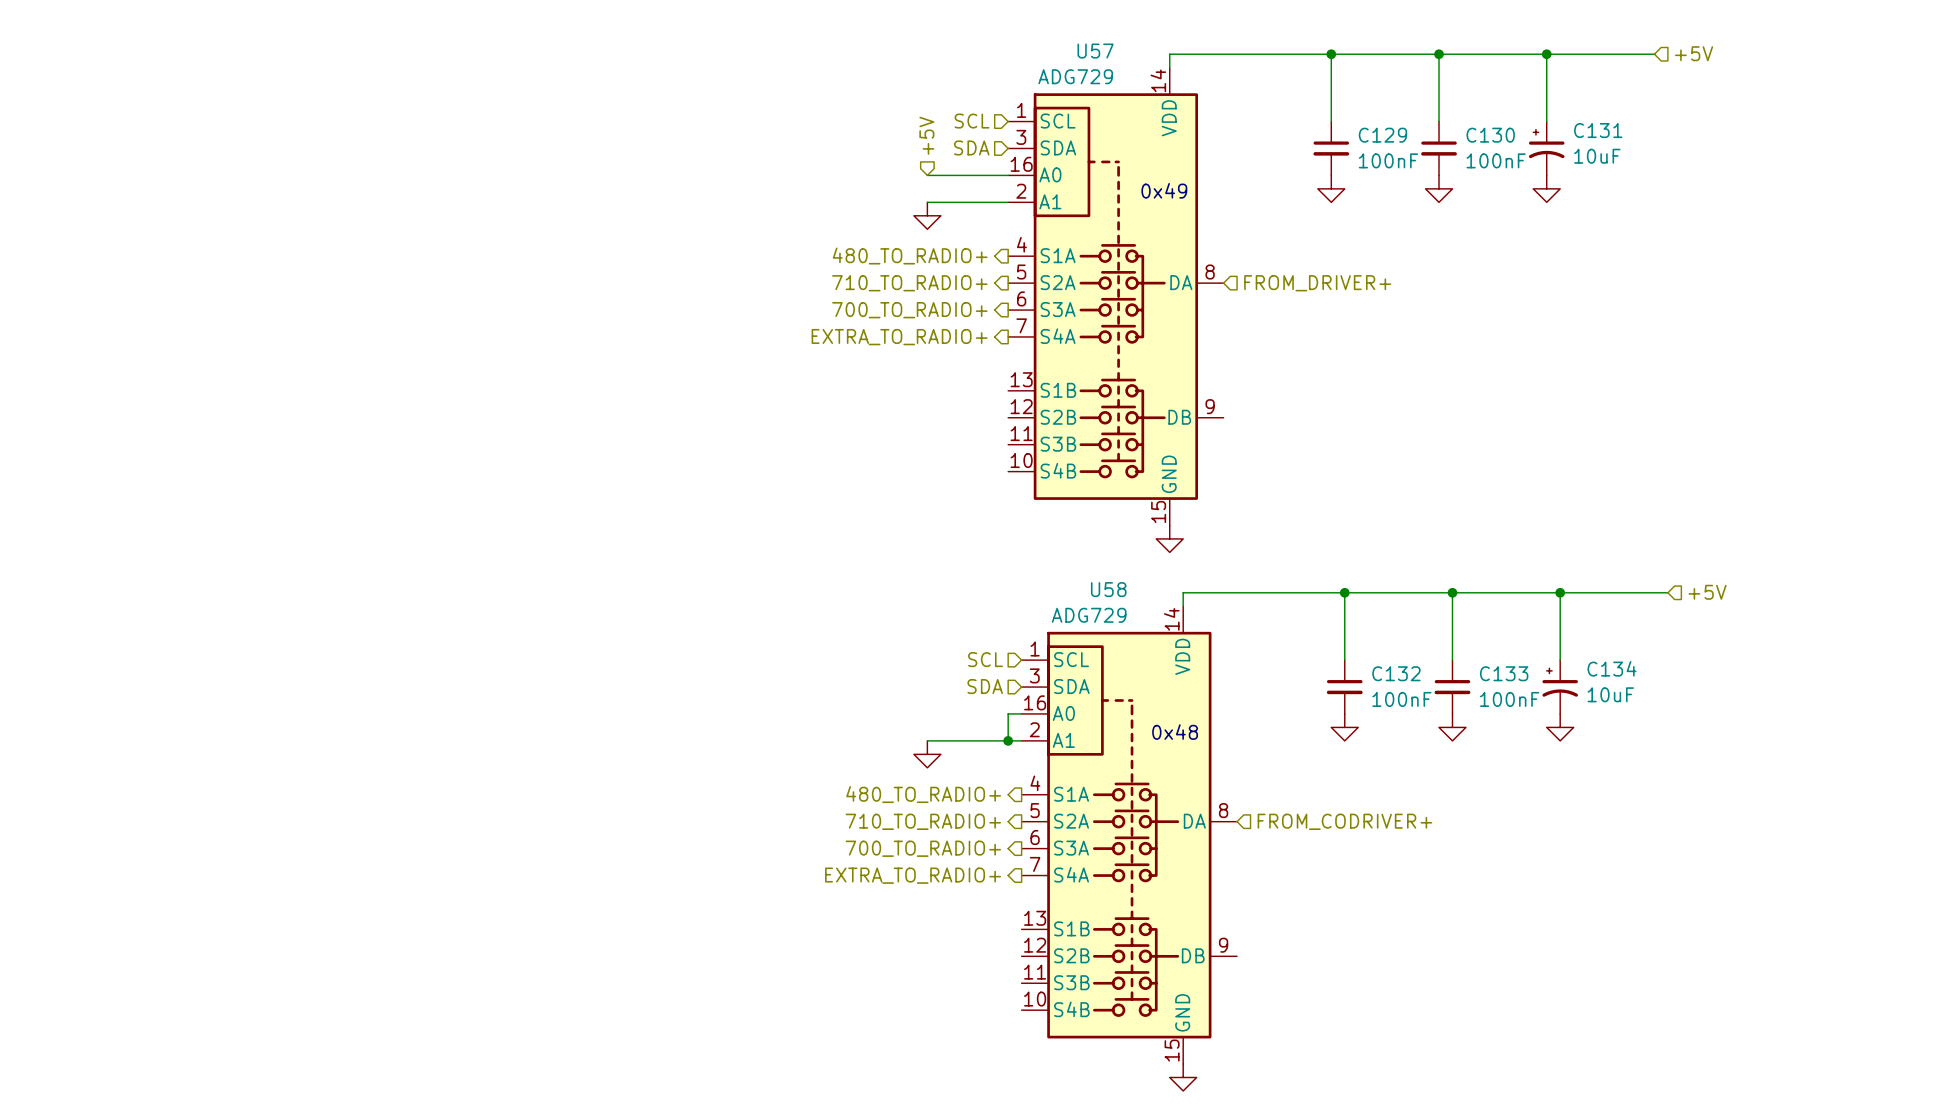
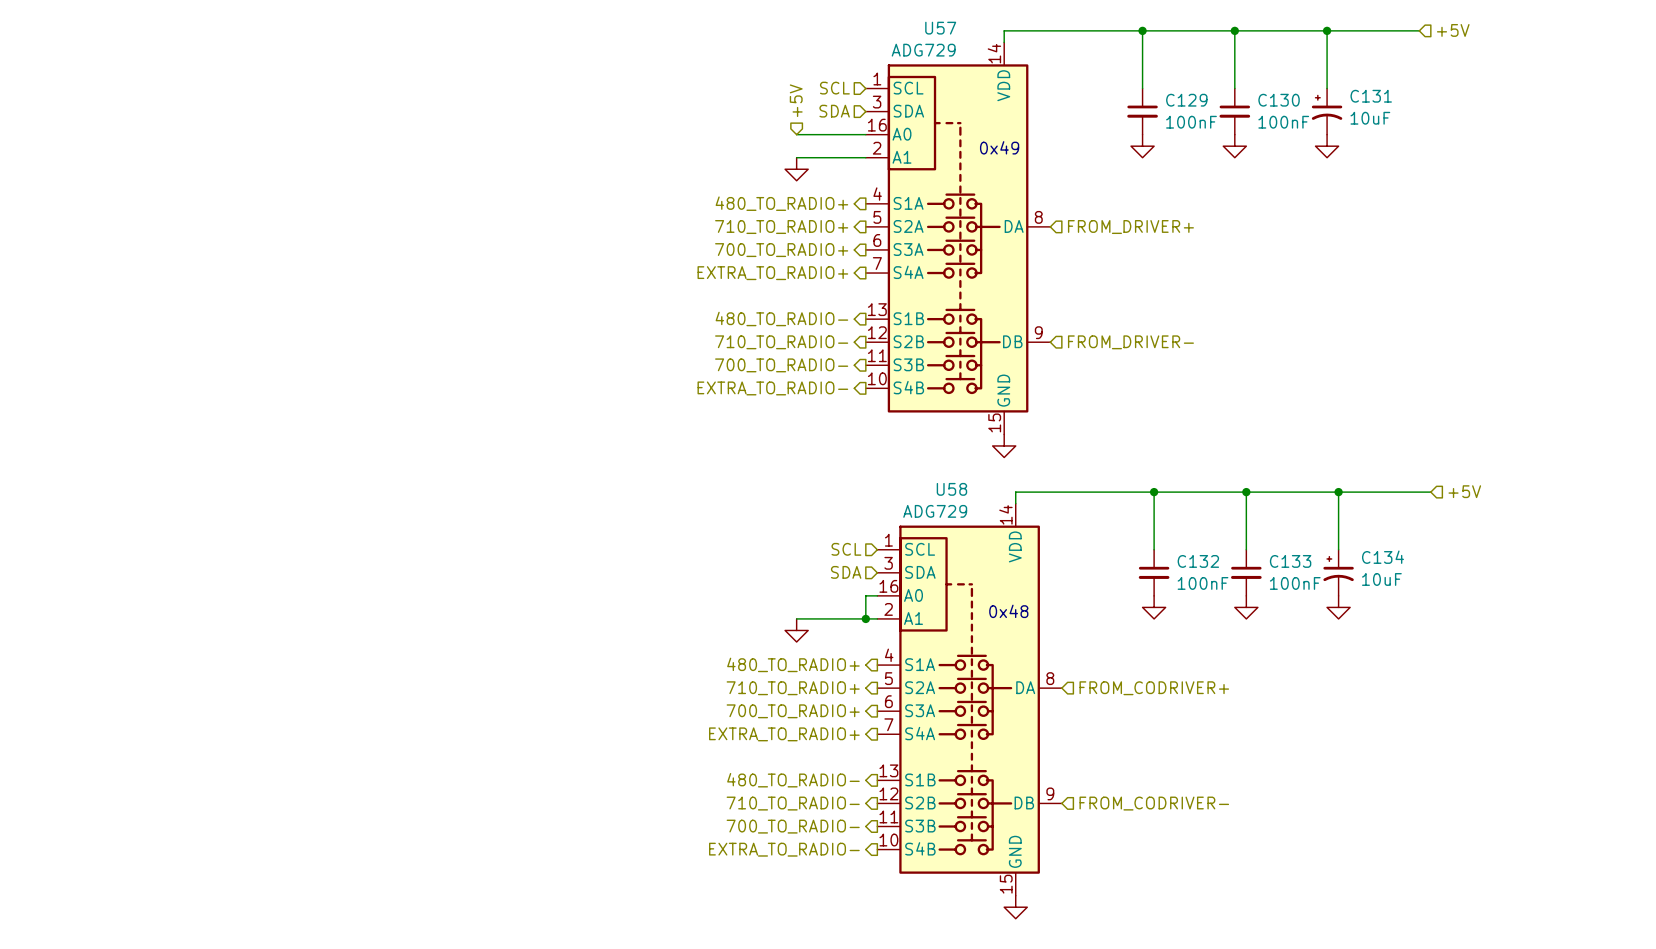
hierarchical label: none -> 480_TO_RADIO- (781, 318)
hierarchical label: none -> 710_TO_RADIO- (781, 342)
hierarchical label: none -> FROM_DRIVER- (1130, 342)
hierarchical label: none -> 700_TO_RADIO- (781, 365)
hierarchical label: none -> EXTRA_TO_RADIO- (772, 388)
hierarchical label: none -> 480_TO_RADIO- (793, 780)
hierarchical label: none -> 710_TO_RADIO- (793, 803)
hierarchical label: none -> FROM_CODRIVER- (1154, 803)
hierarchical label: none -> 700_TO_RADIO- (793, 826)
hierarchical label: none -> EXTRA_TO_RADIO- (784, 849)

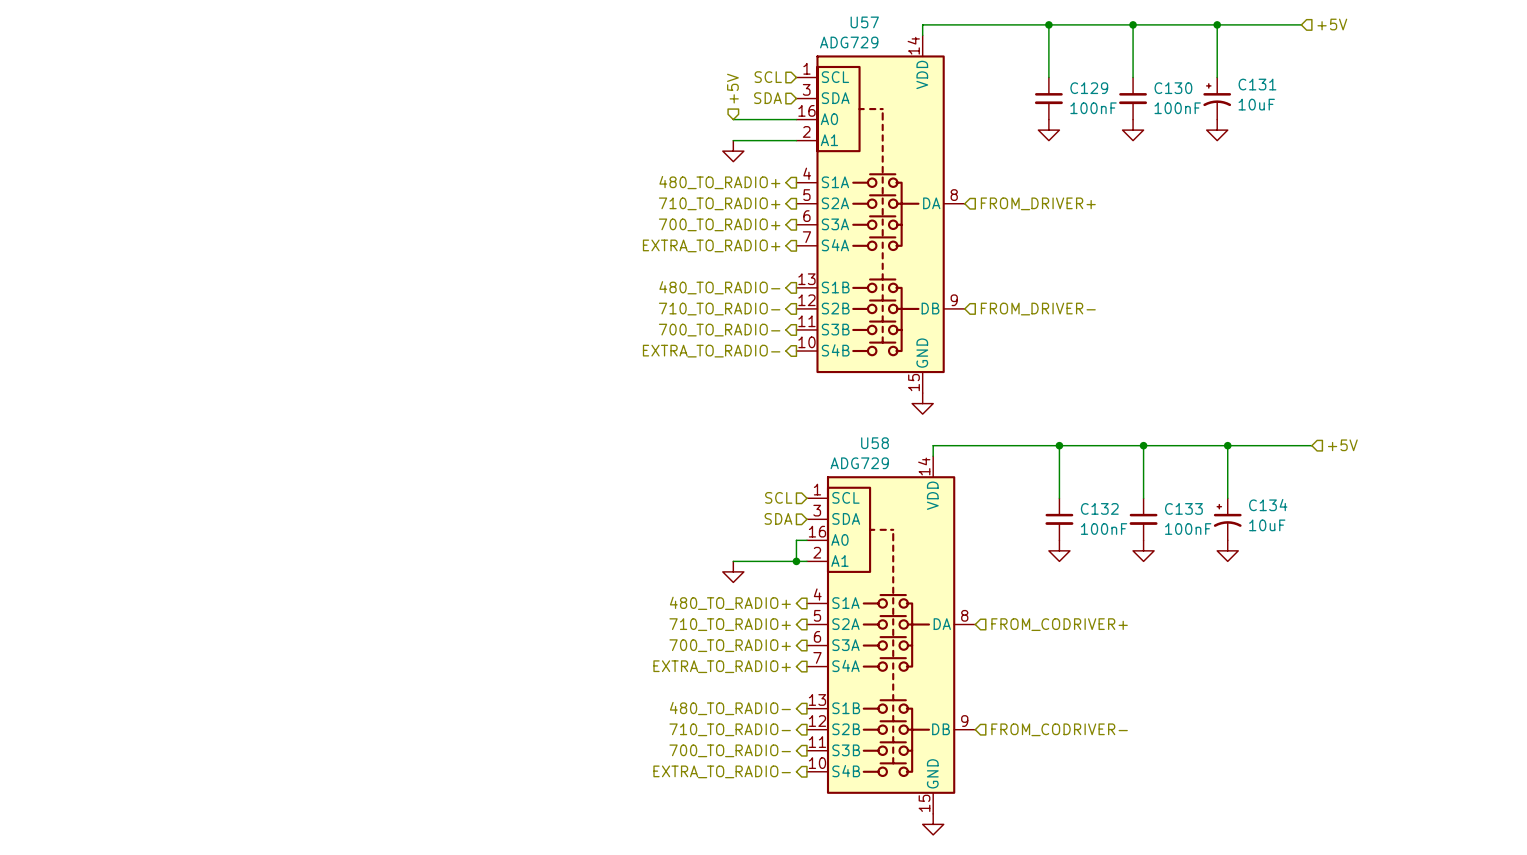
text: 0x49 (999, 147) -> none
text: 0x48 (1008, 611) -> none

